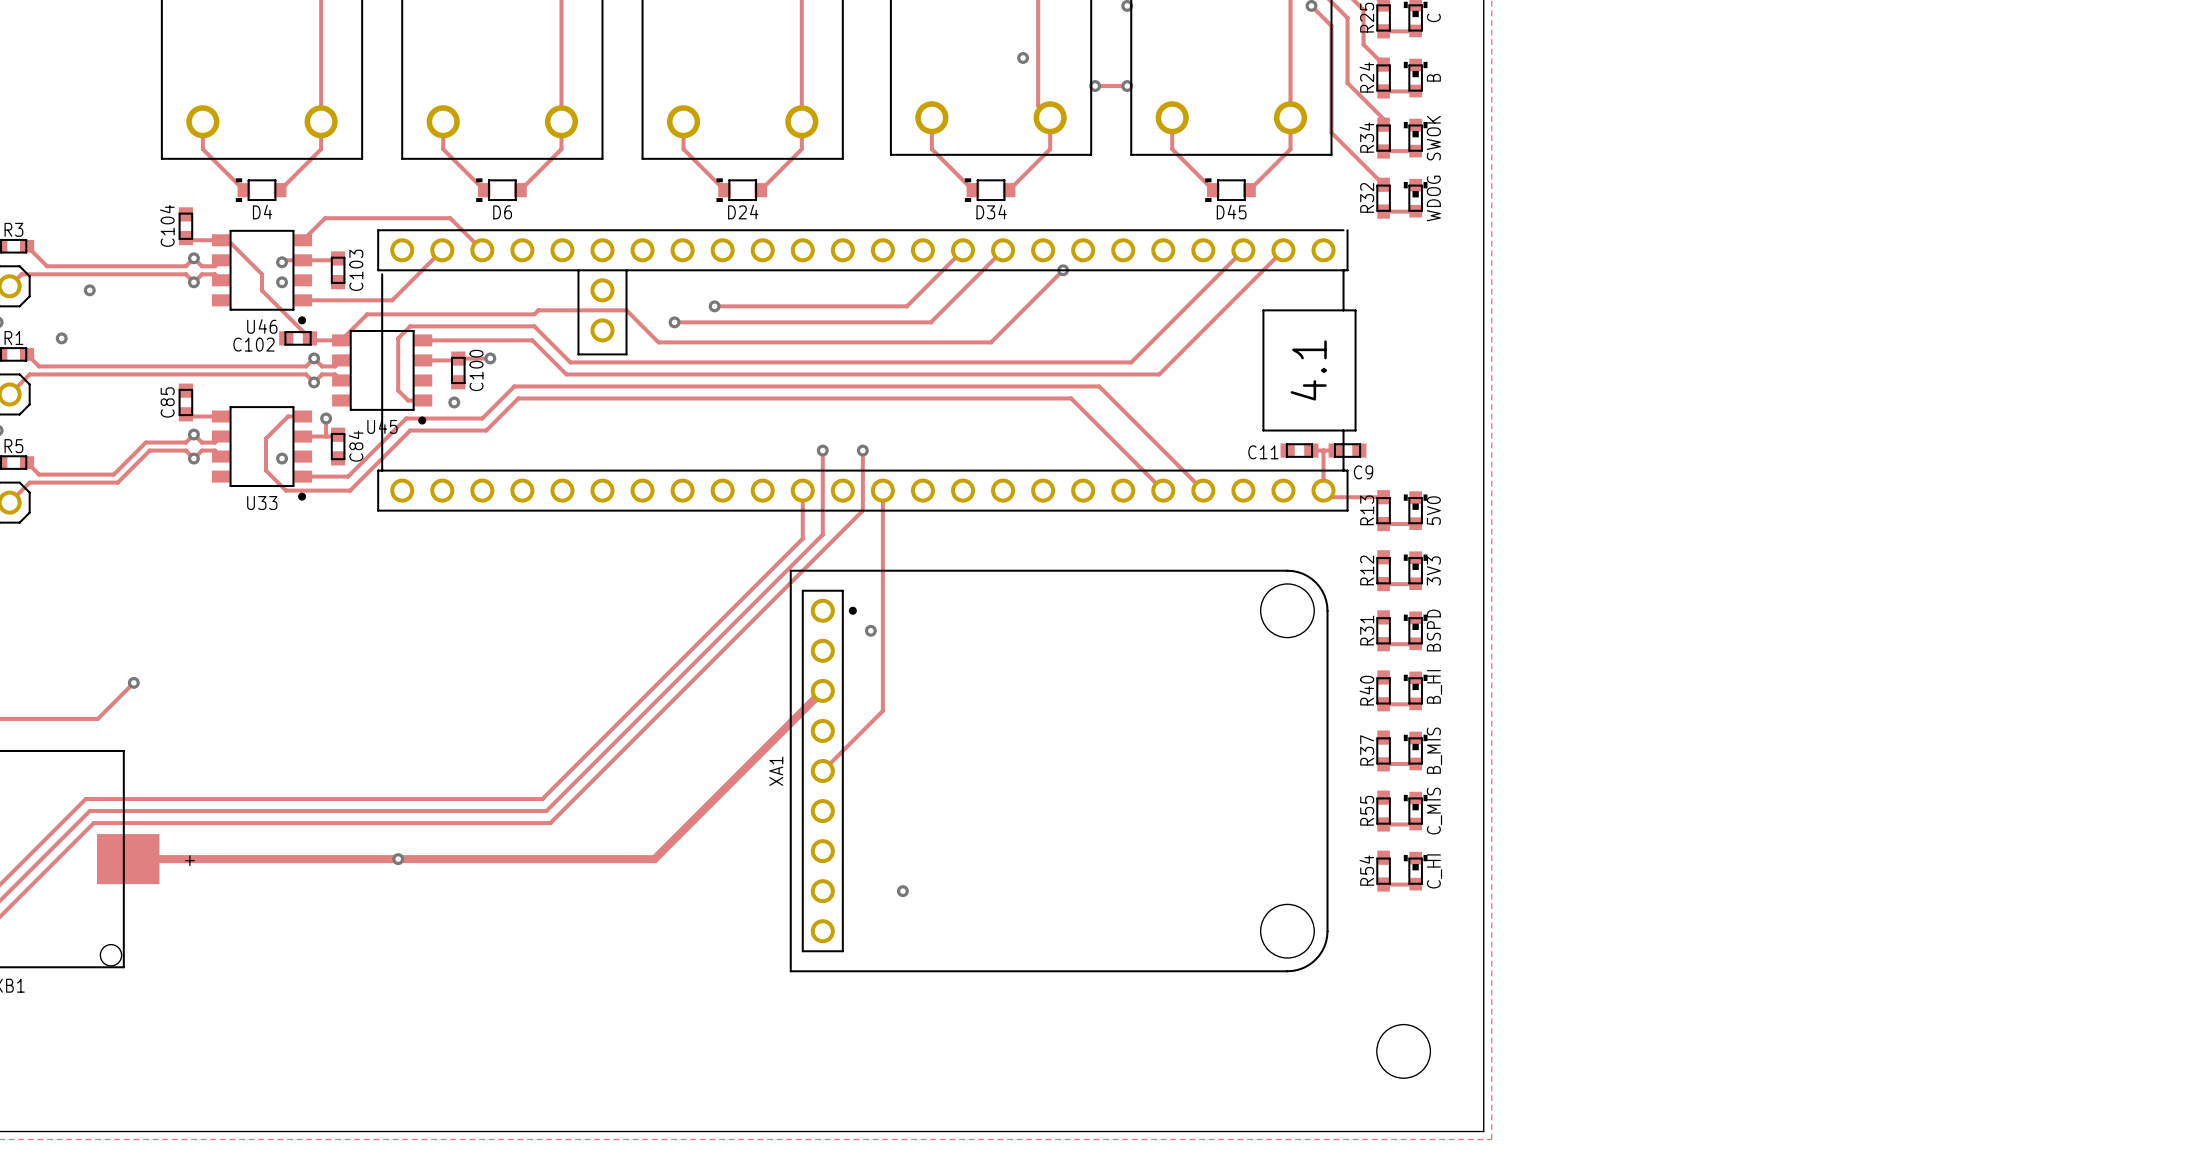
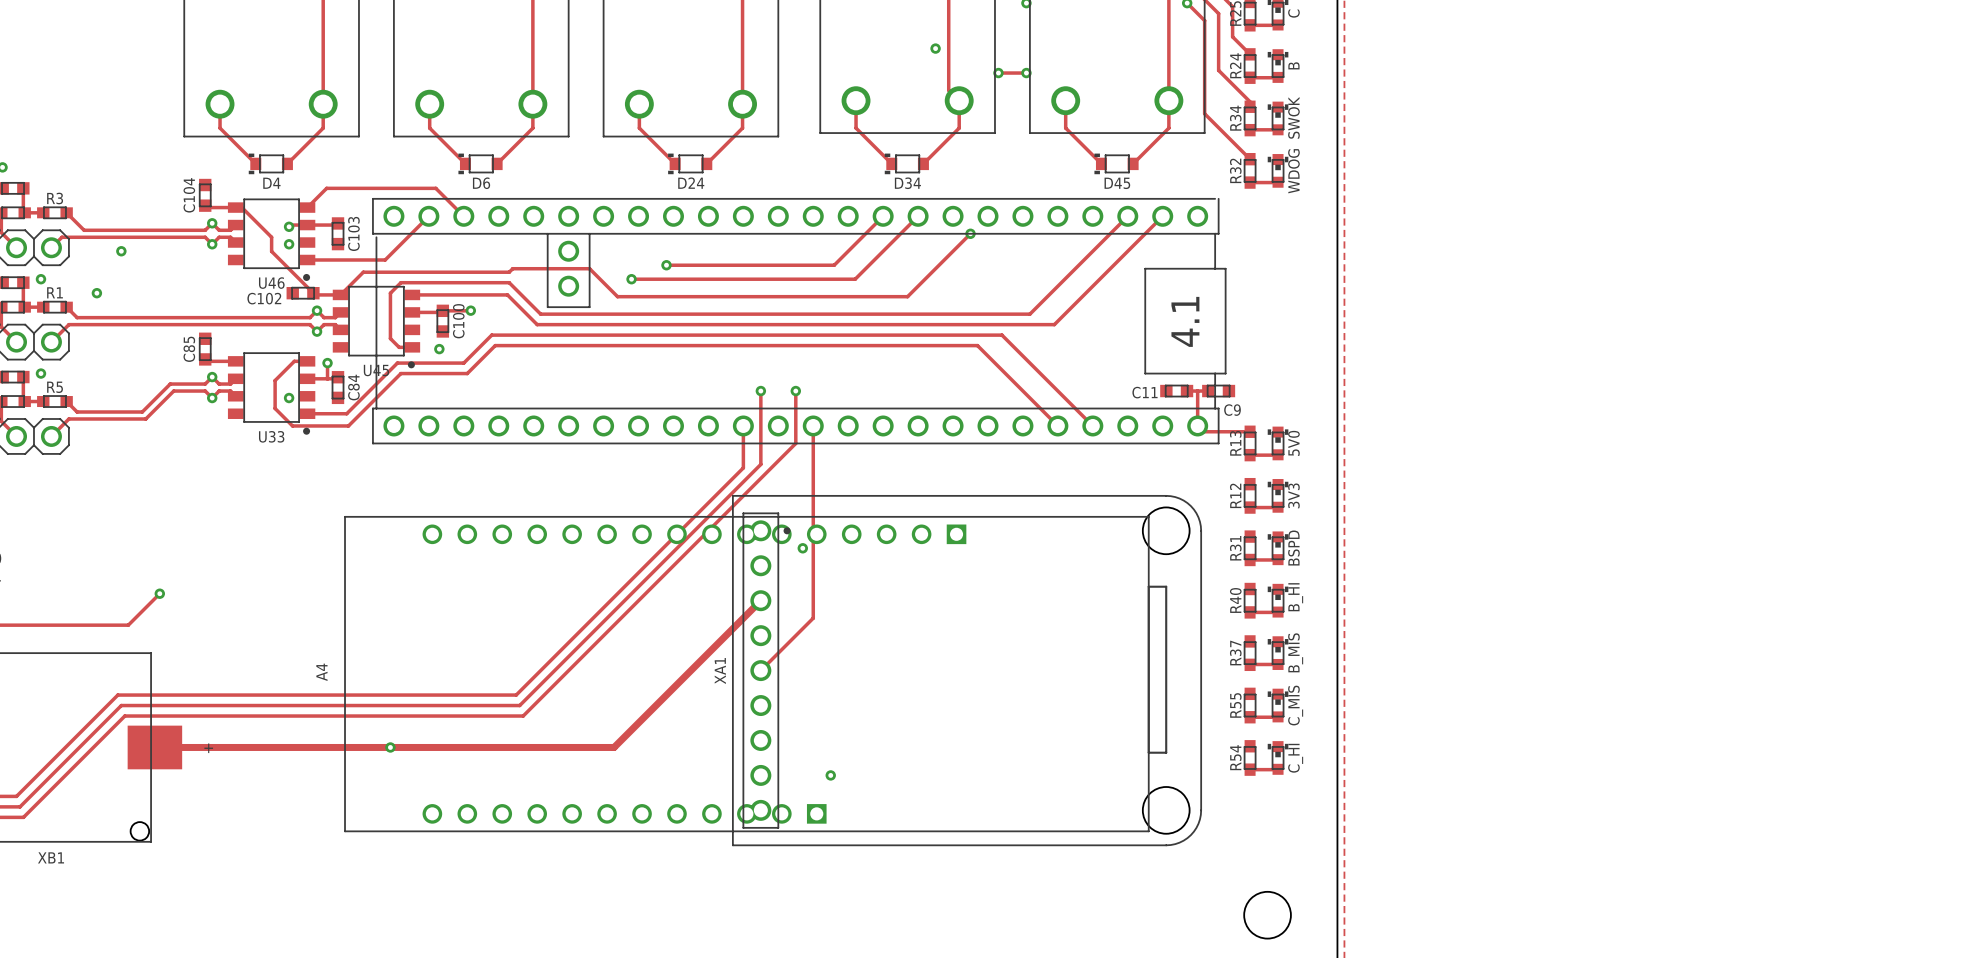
A4: none -> (755, 674)

